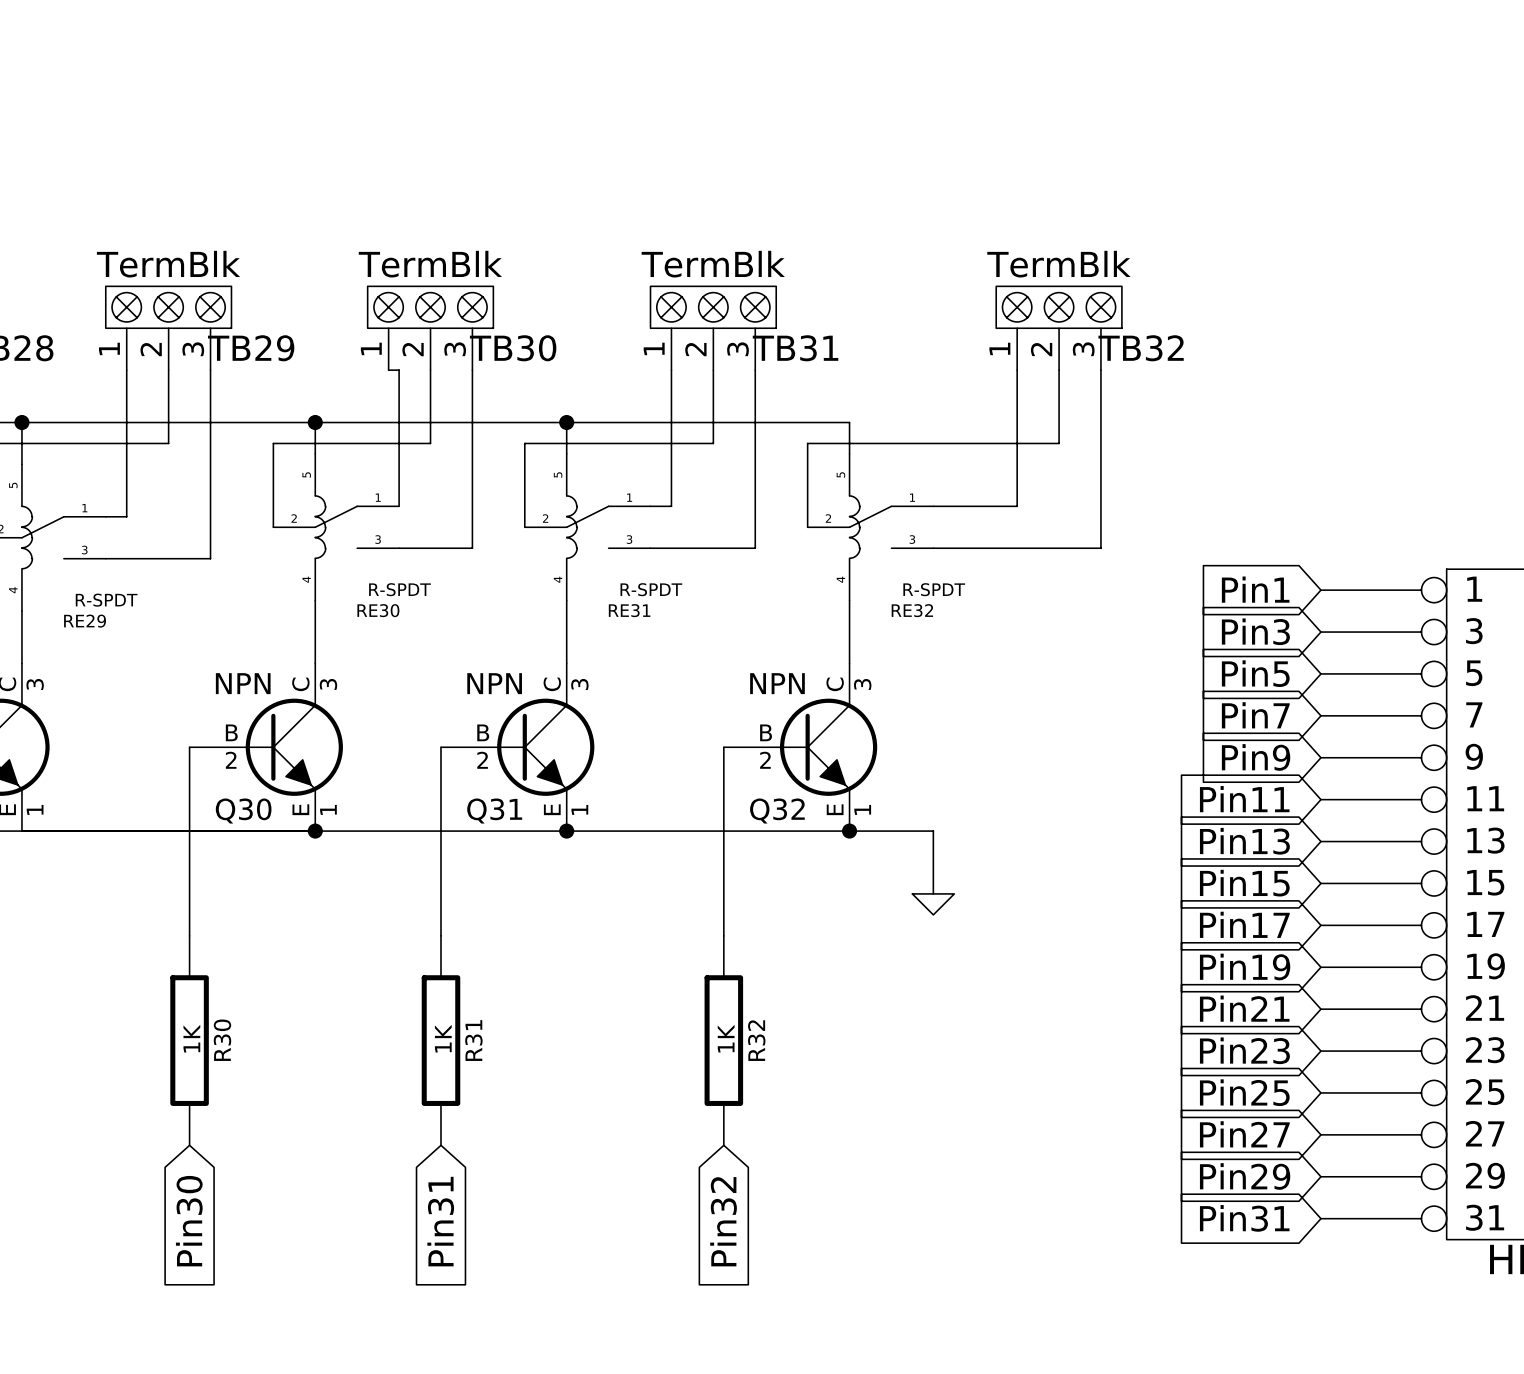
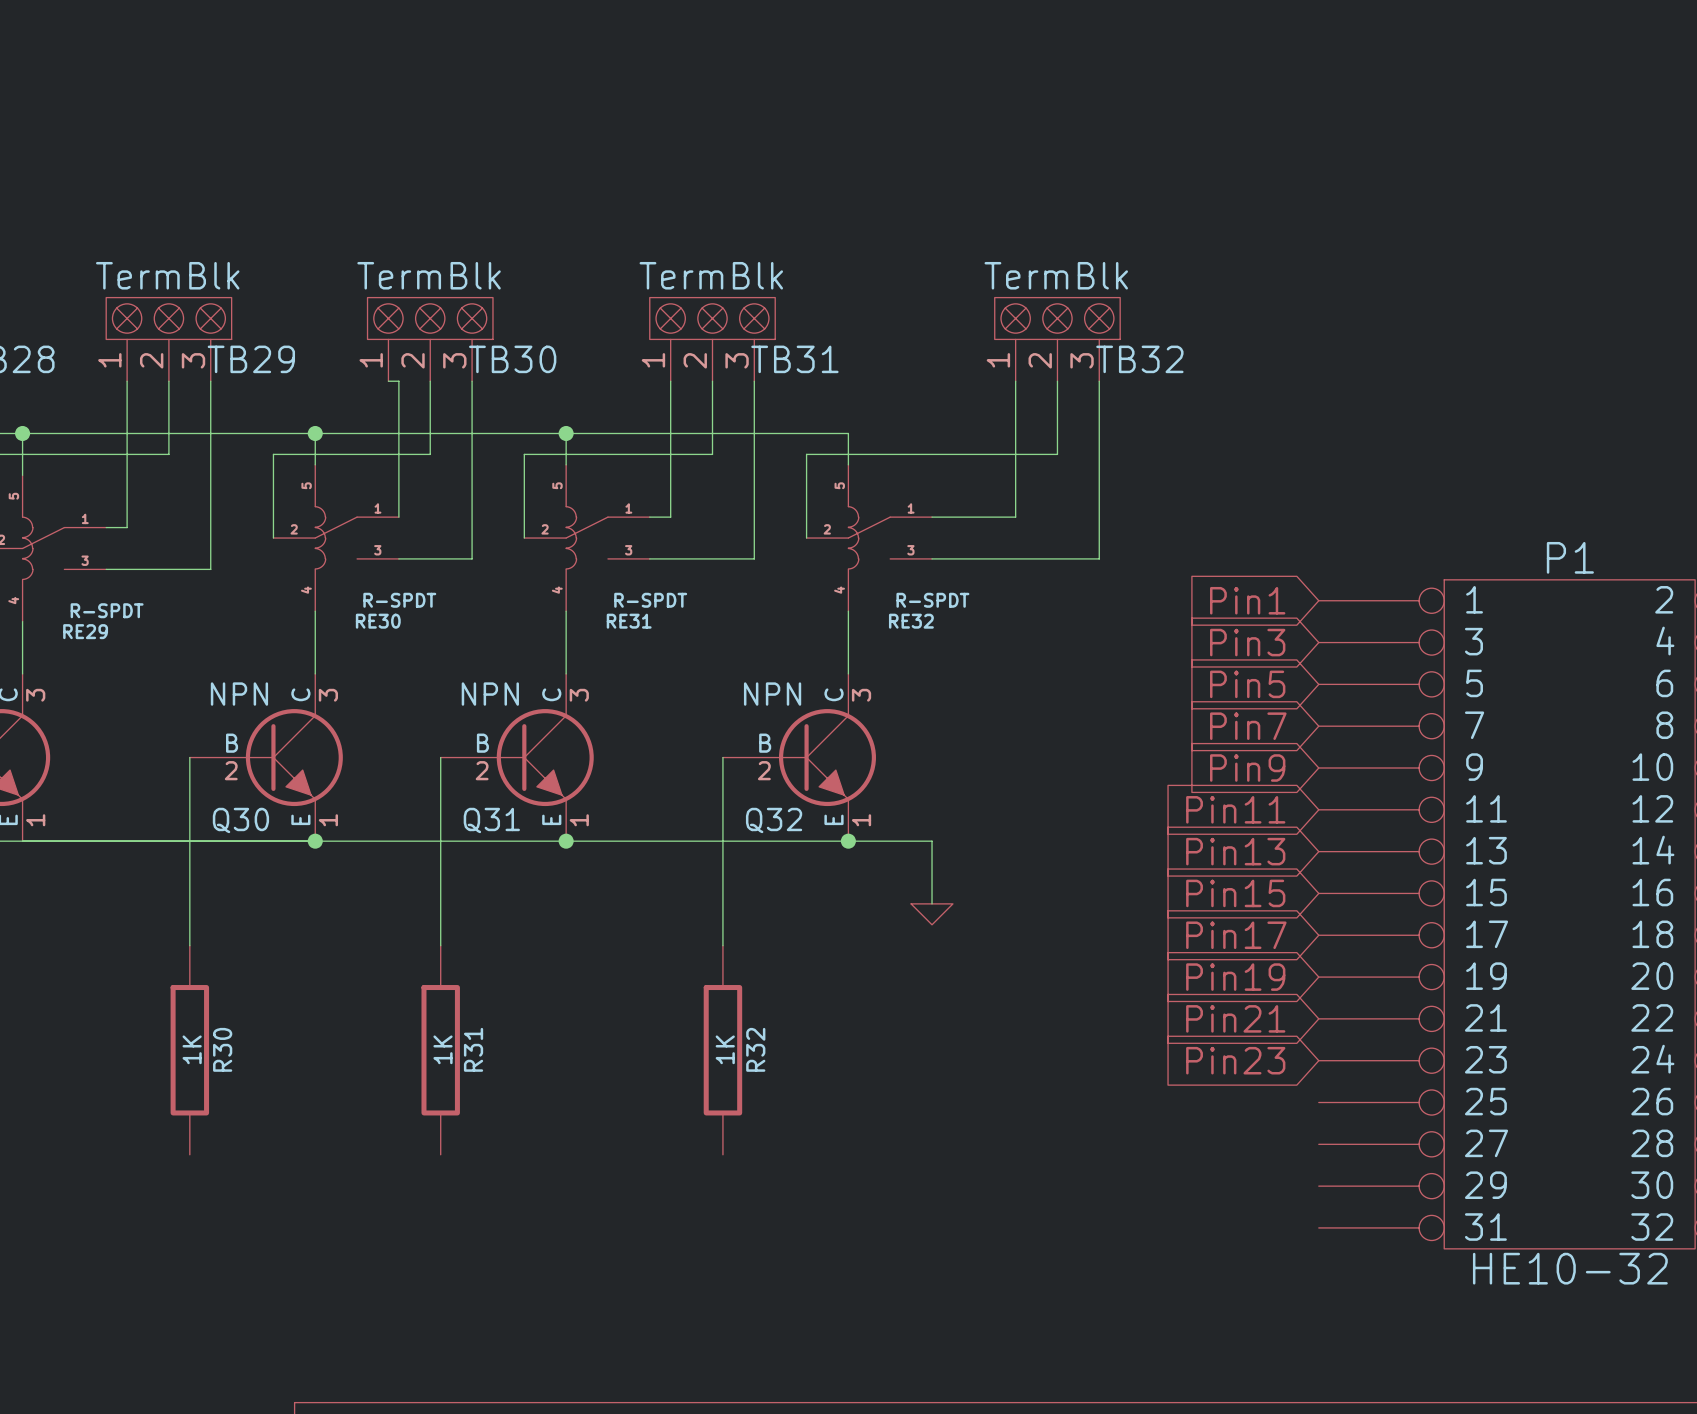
global label: Pin25 (1244, 1092) -> none
global label: Pin27 (1244, 1134) -> none
global label: Pin29 (1245, 1176) -> none
global label: Pin31 (1244, 1218) -> none
global label: Pin30 (189, 1221) -> none
global label: Pin31 (440, 1221) -> none
global label: Pin32 (723, 1221) -> none

